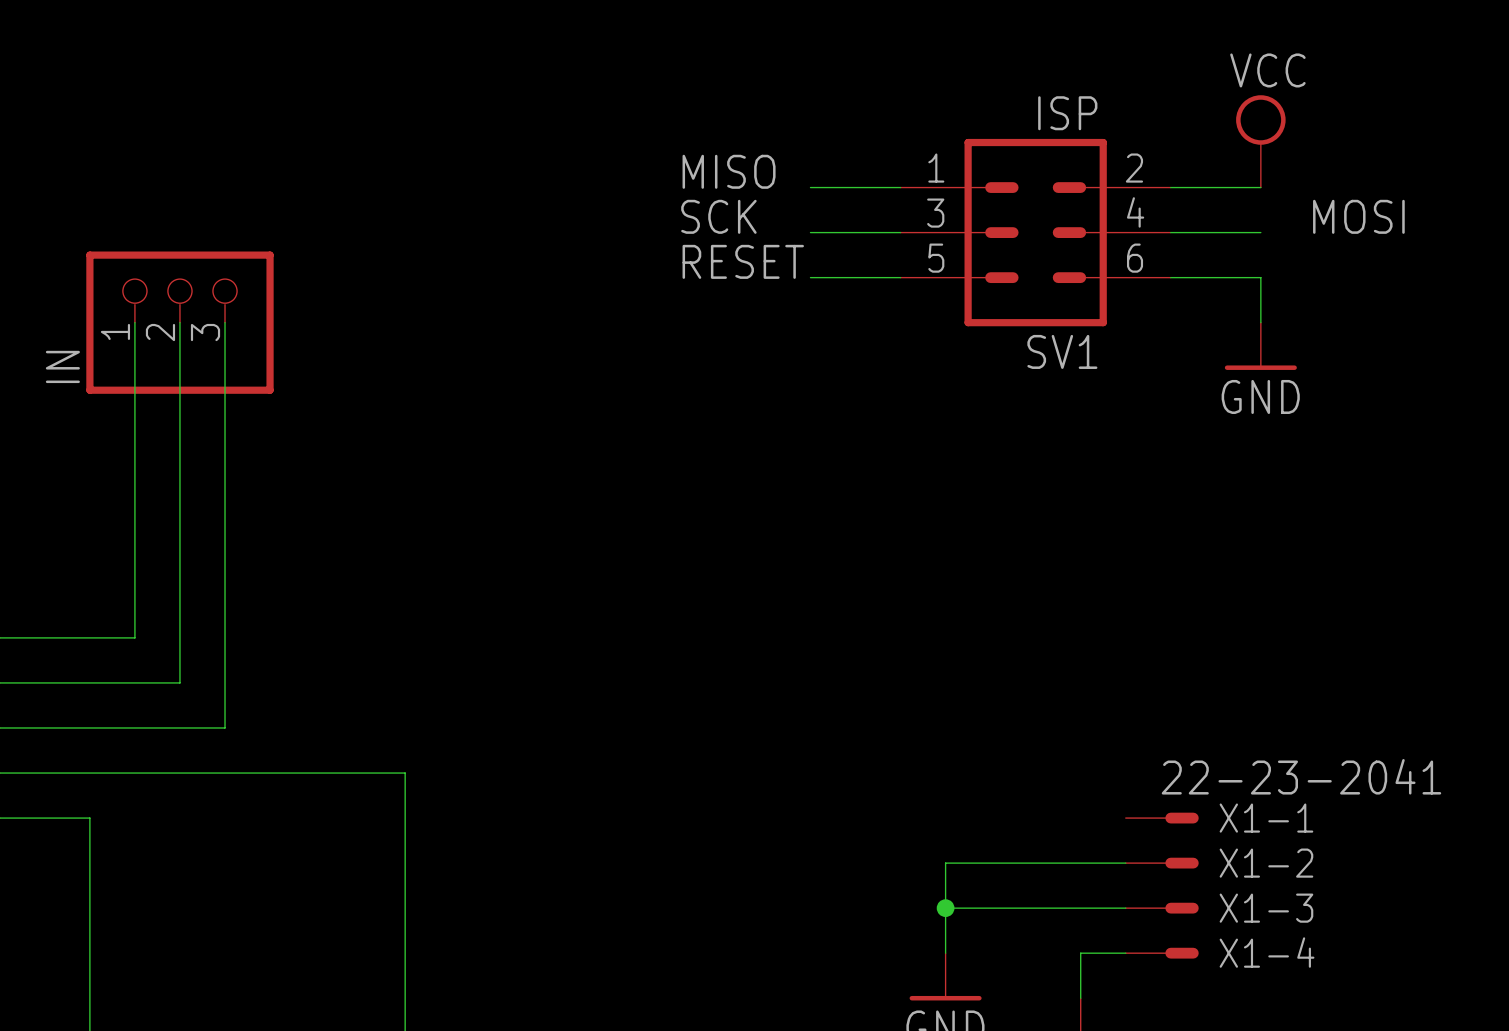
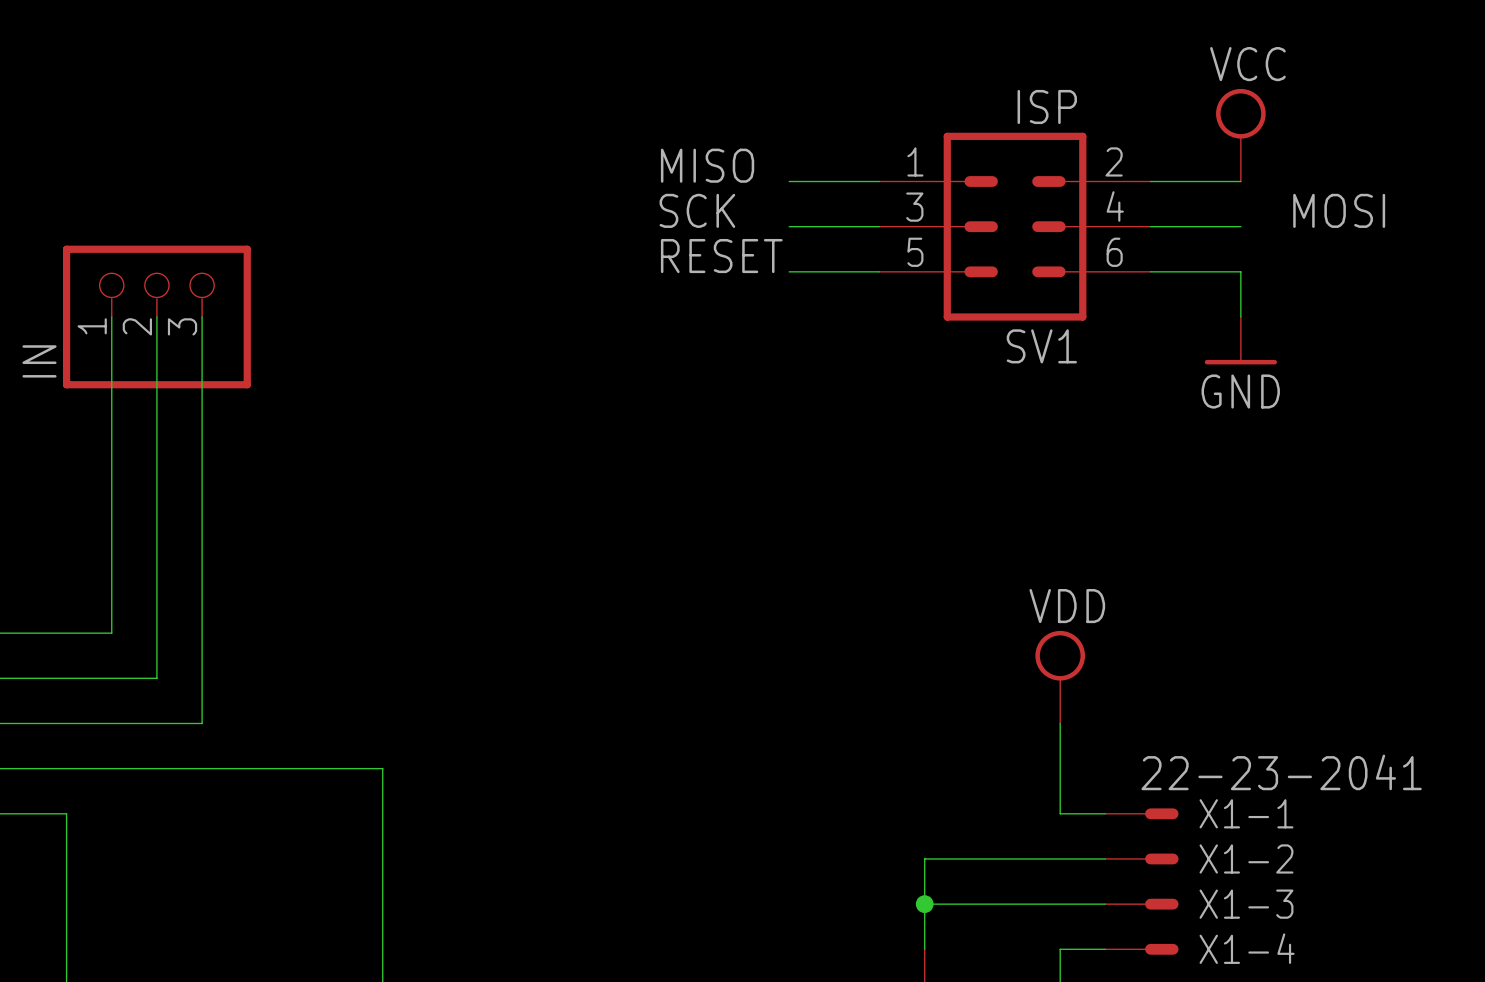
power symbol: none -> VDD (1060, 677)
wire: none -> (1060, 723) (1060, 813) (1105, 813)

